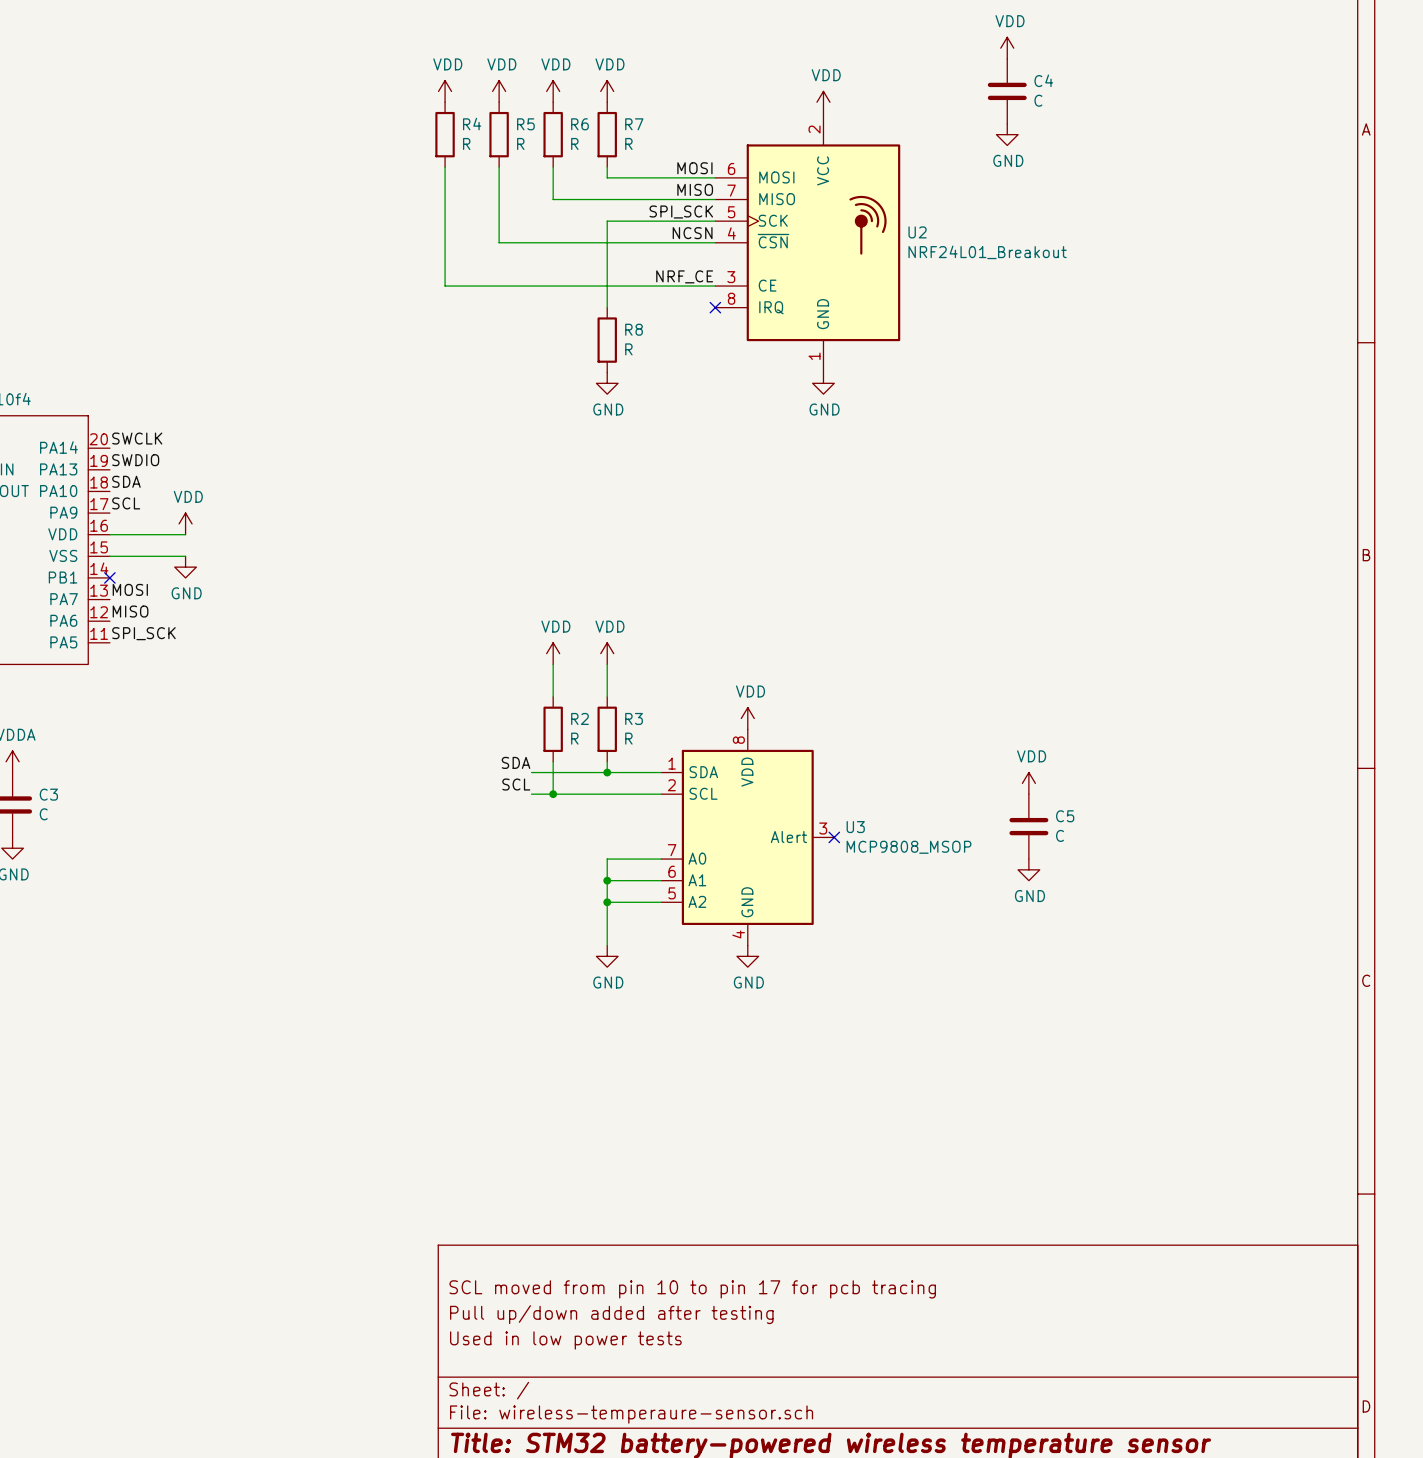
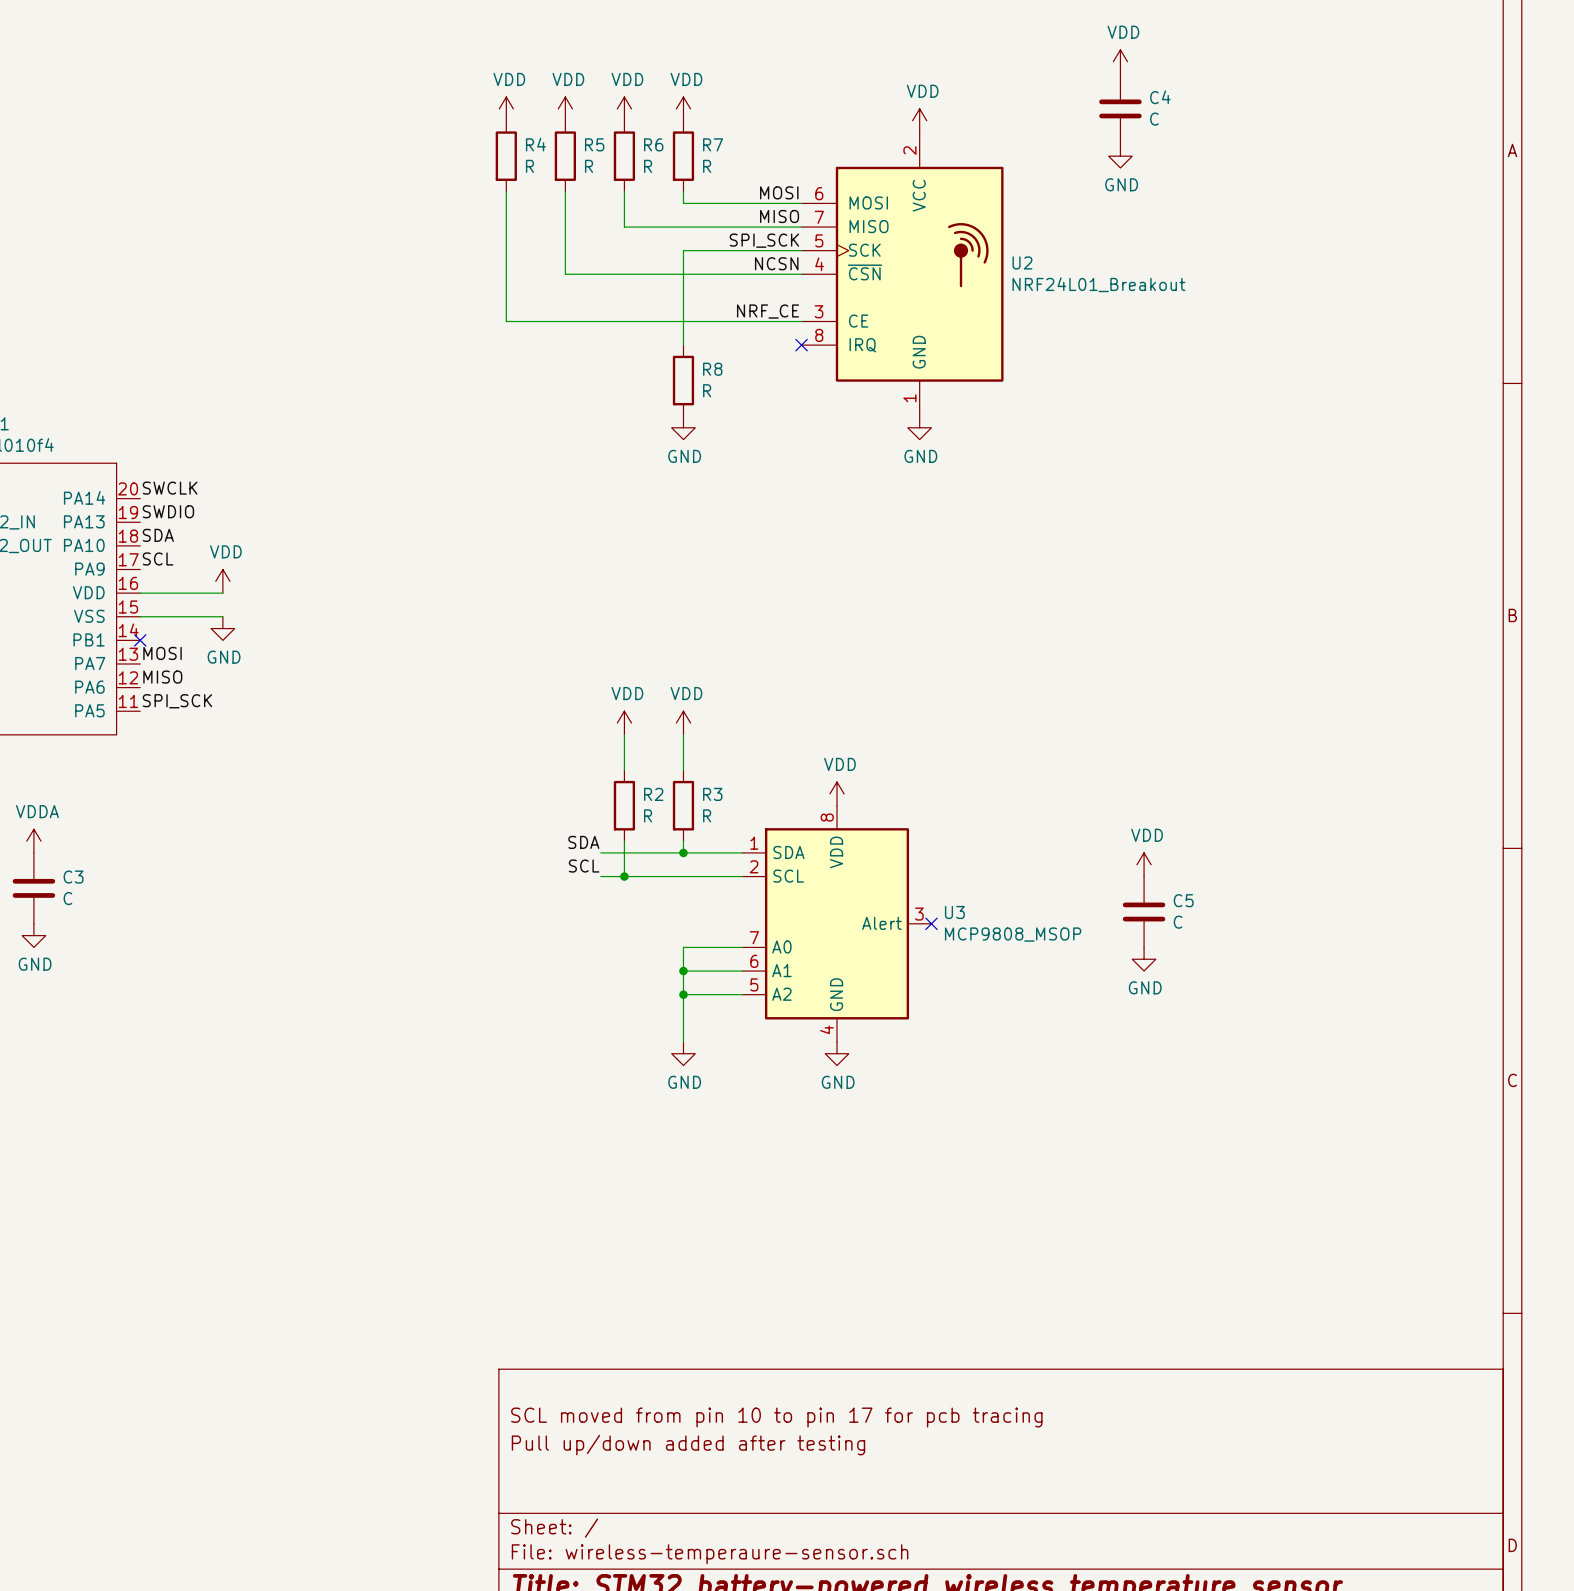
title block: Used in low power tests (565, 1340) -> none

